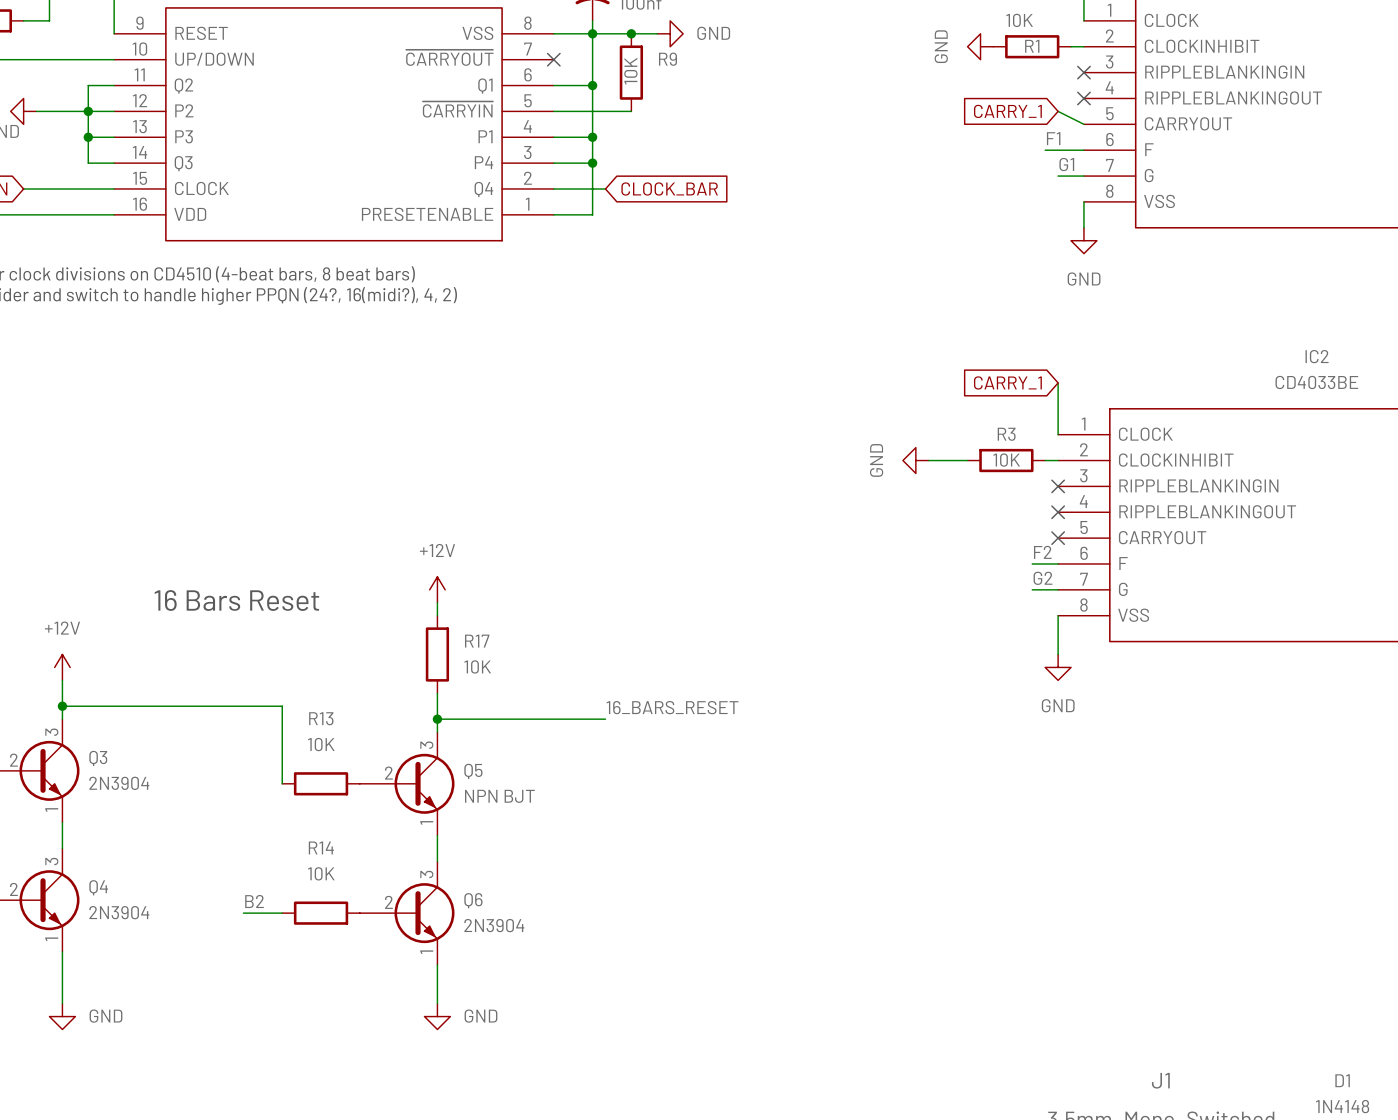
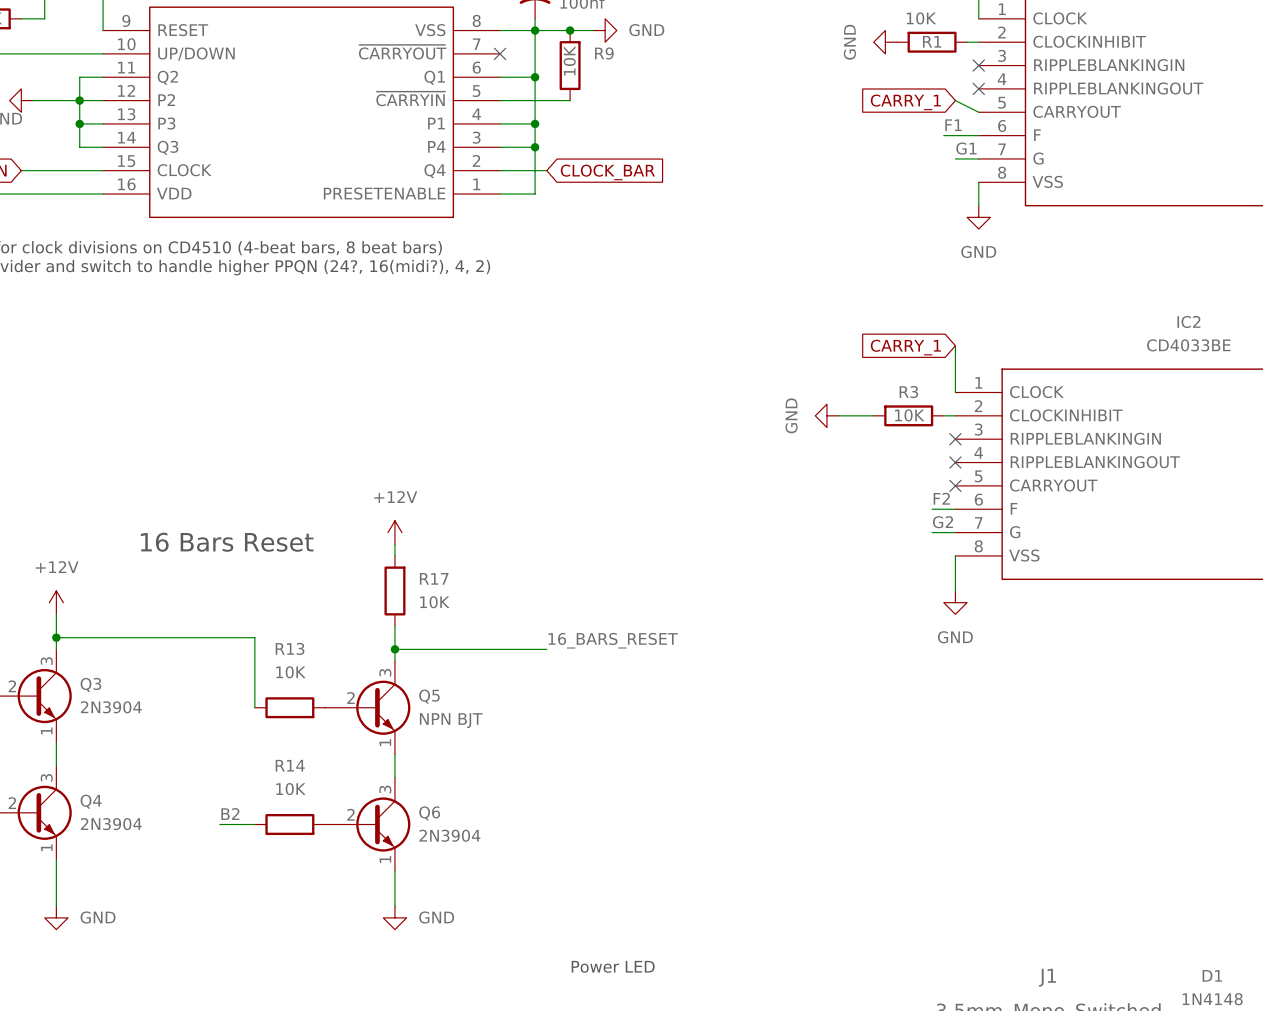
text: none -> Power LED (613, 966)

